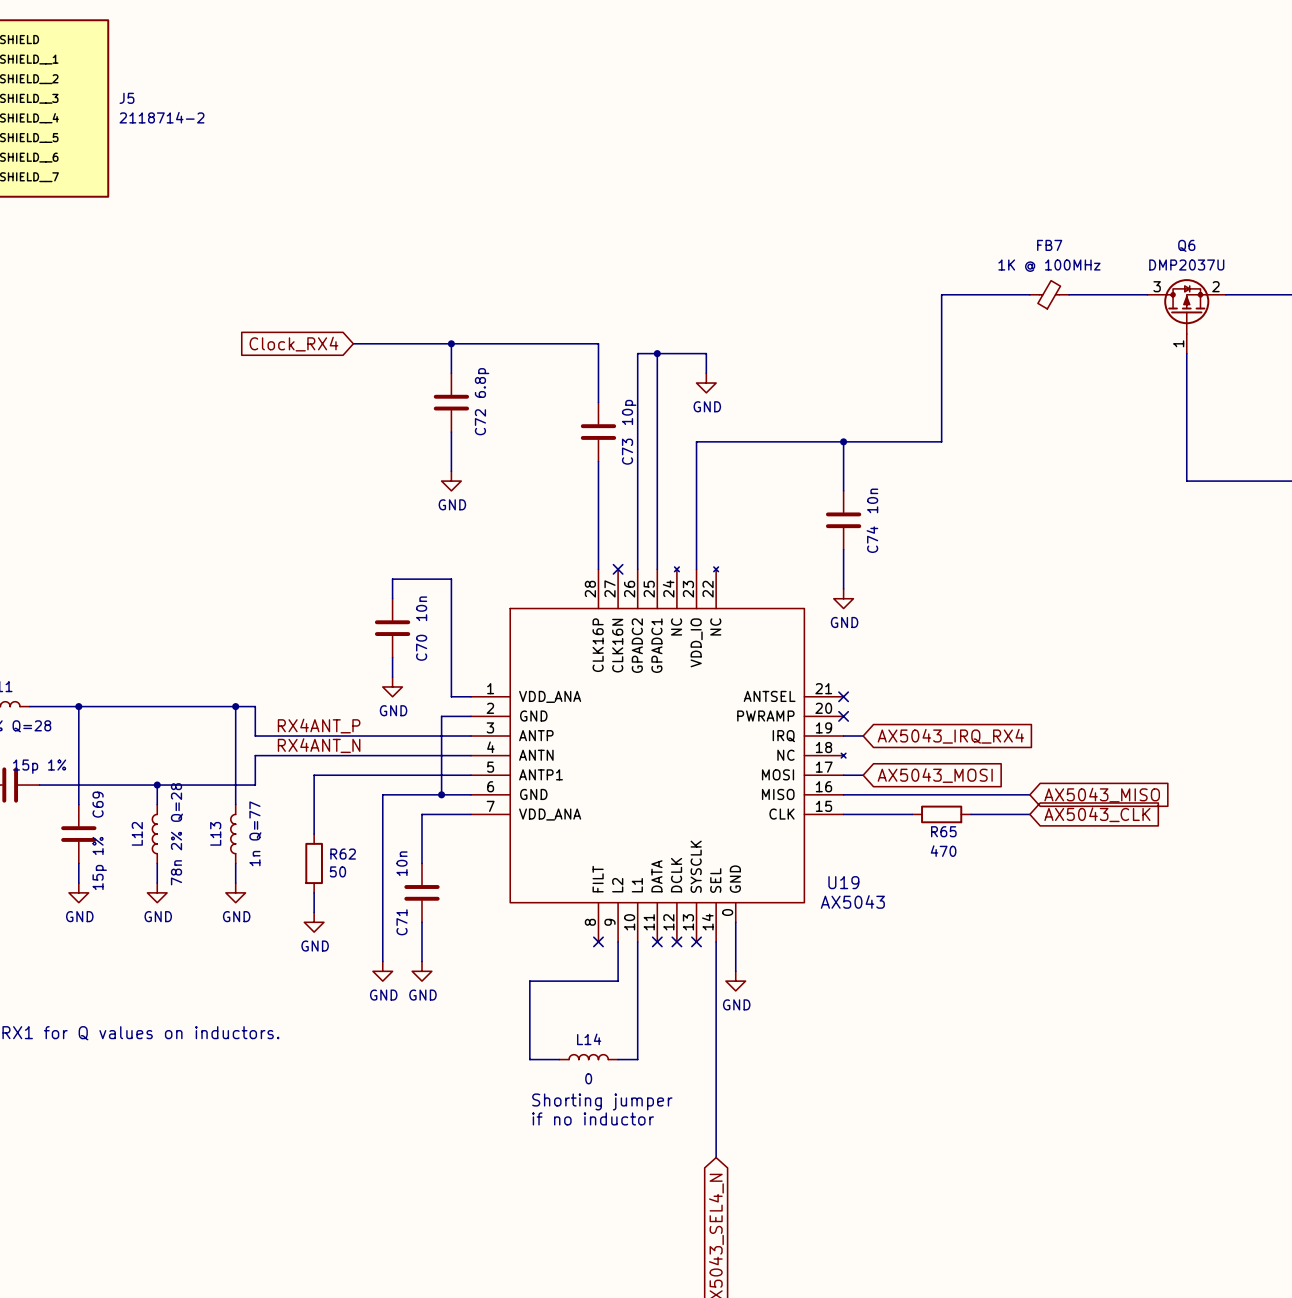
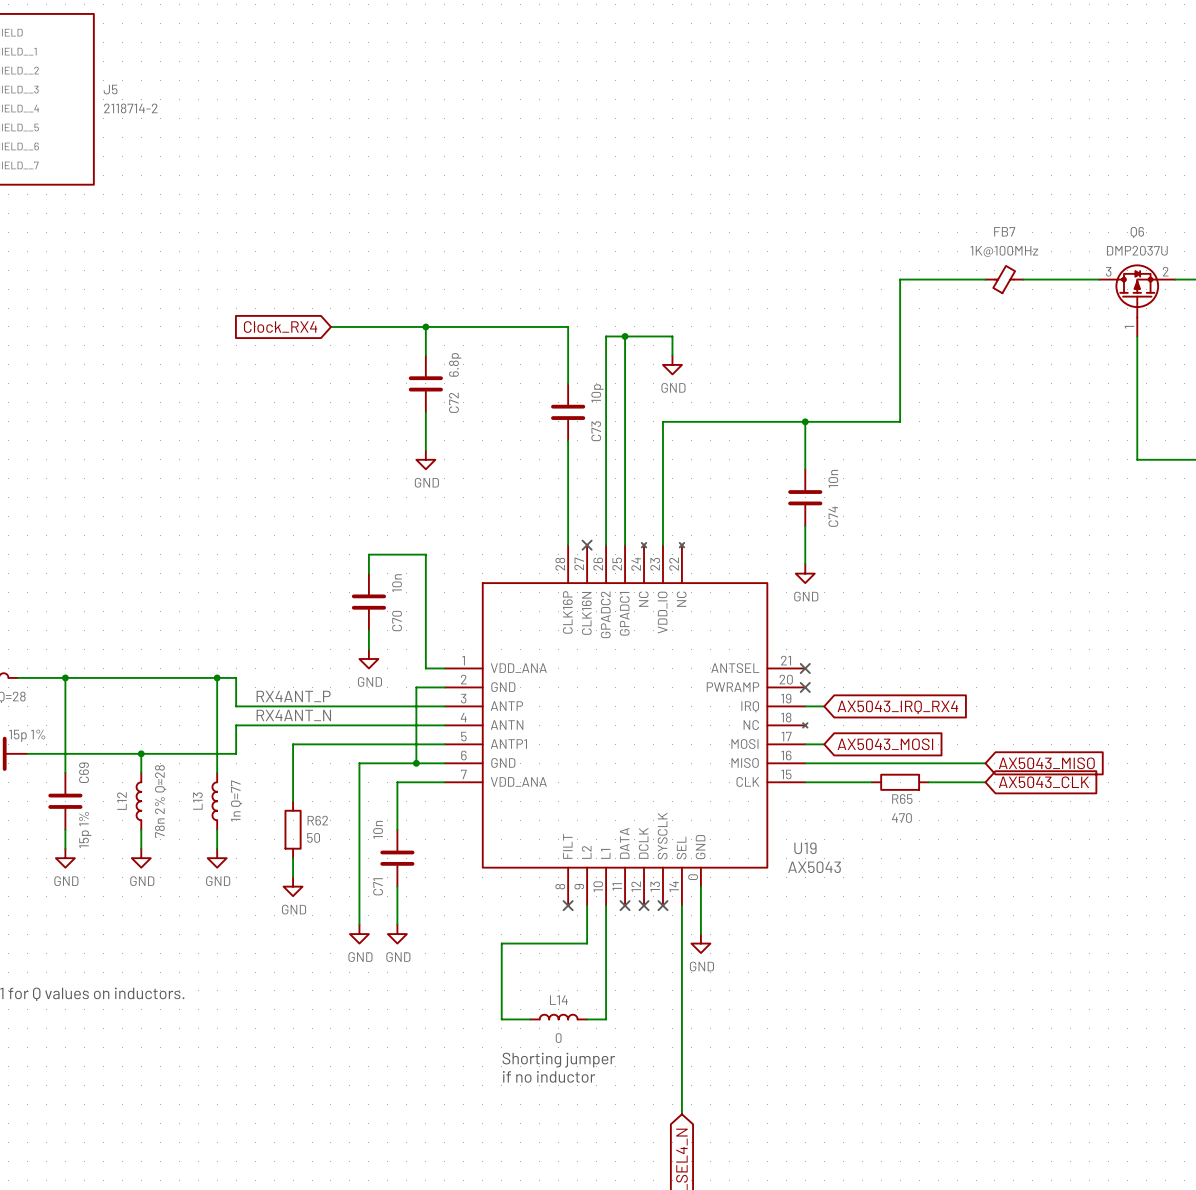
FB7 value: 1K @ 100MHz (1049, 265) -> 1K@100MHz (1004, 251)

